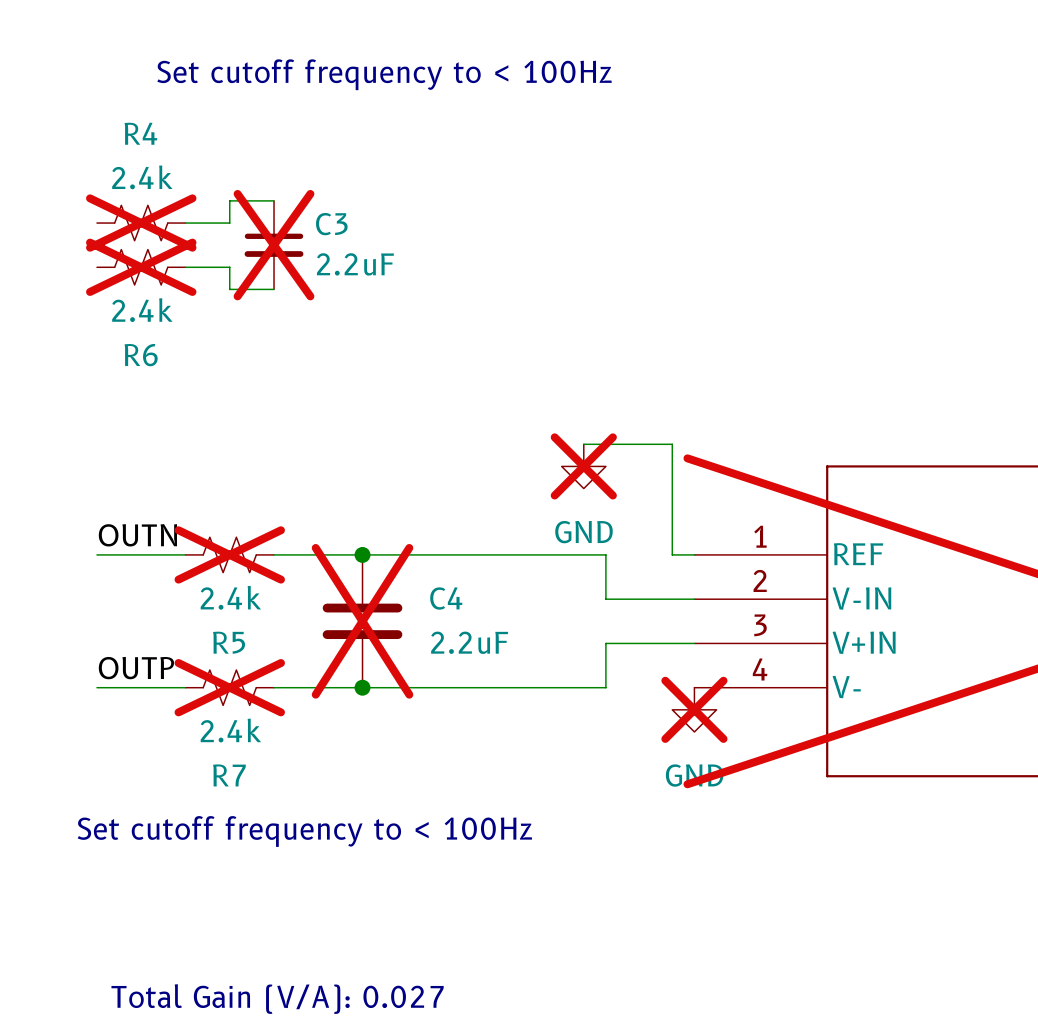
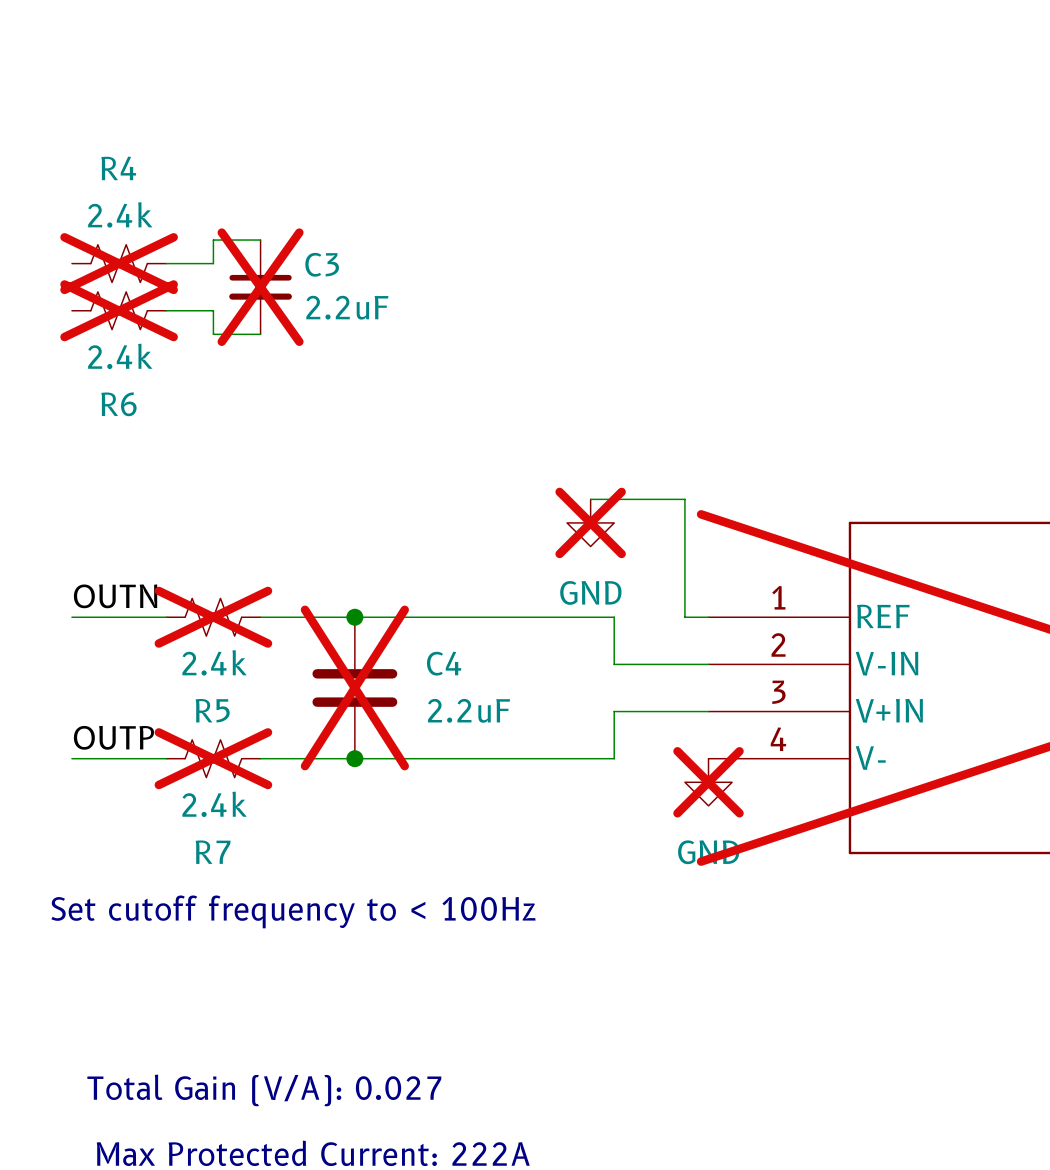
text: Set cutoff frequency to < 100Hz (384, 74) -> none

